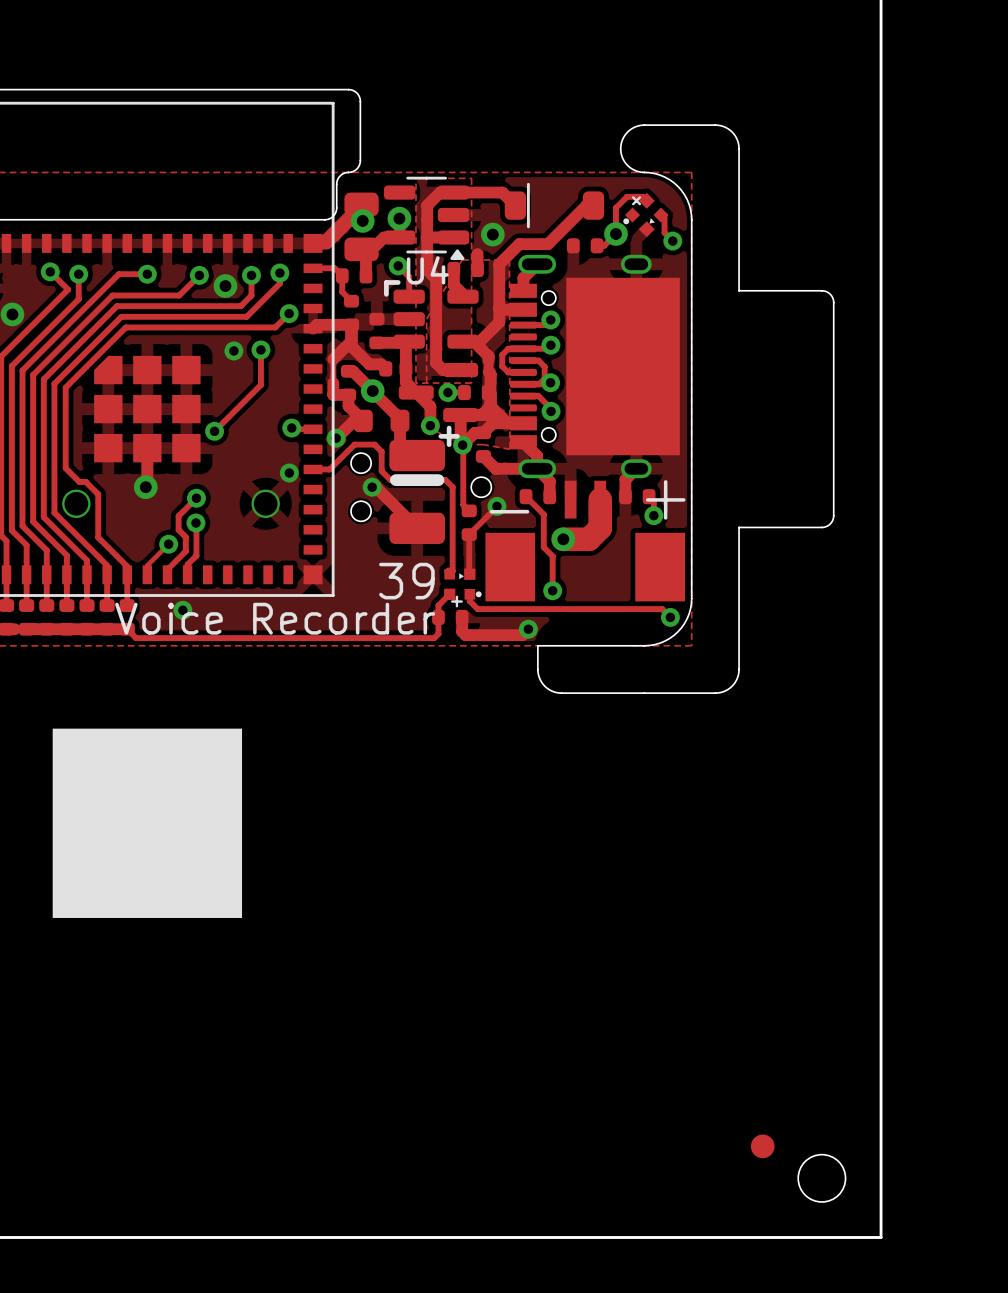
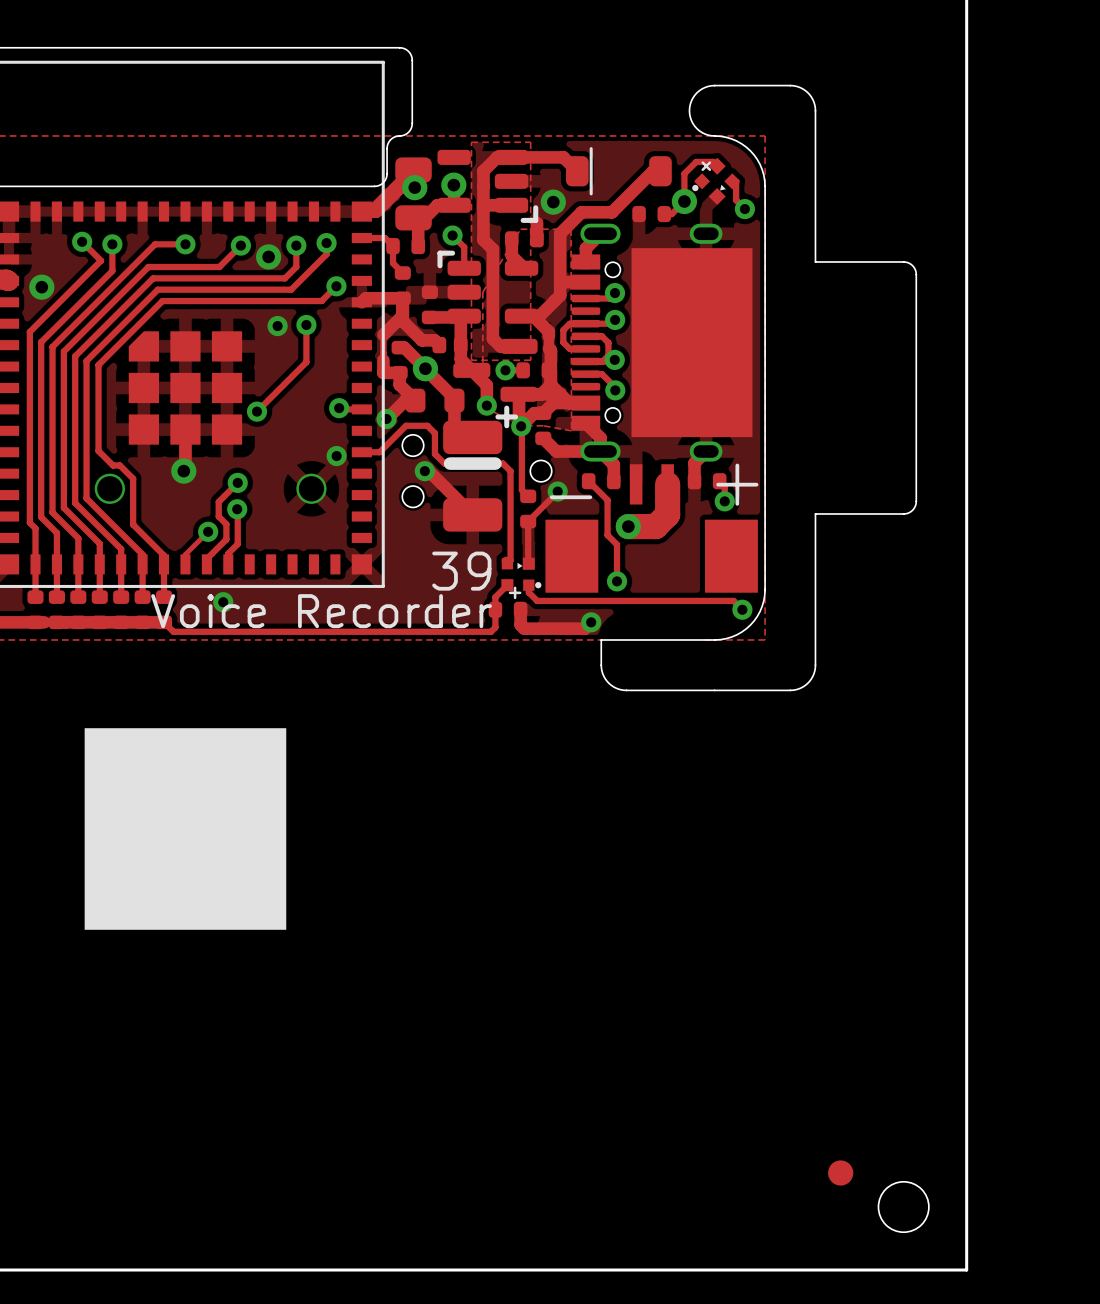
U4: (426, 218) -> none
part: none -> (487, 186)

